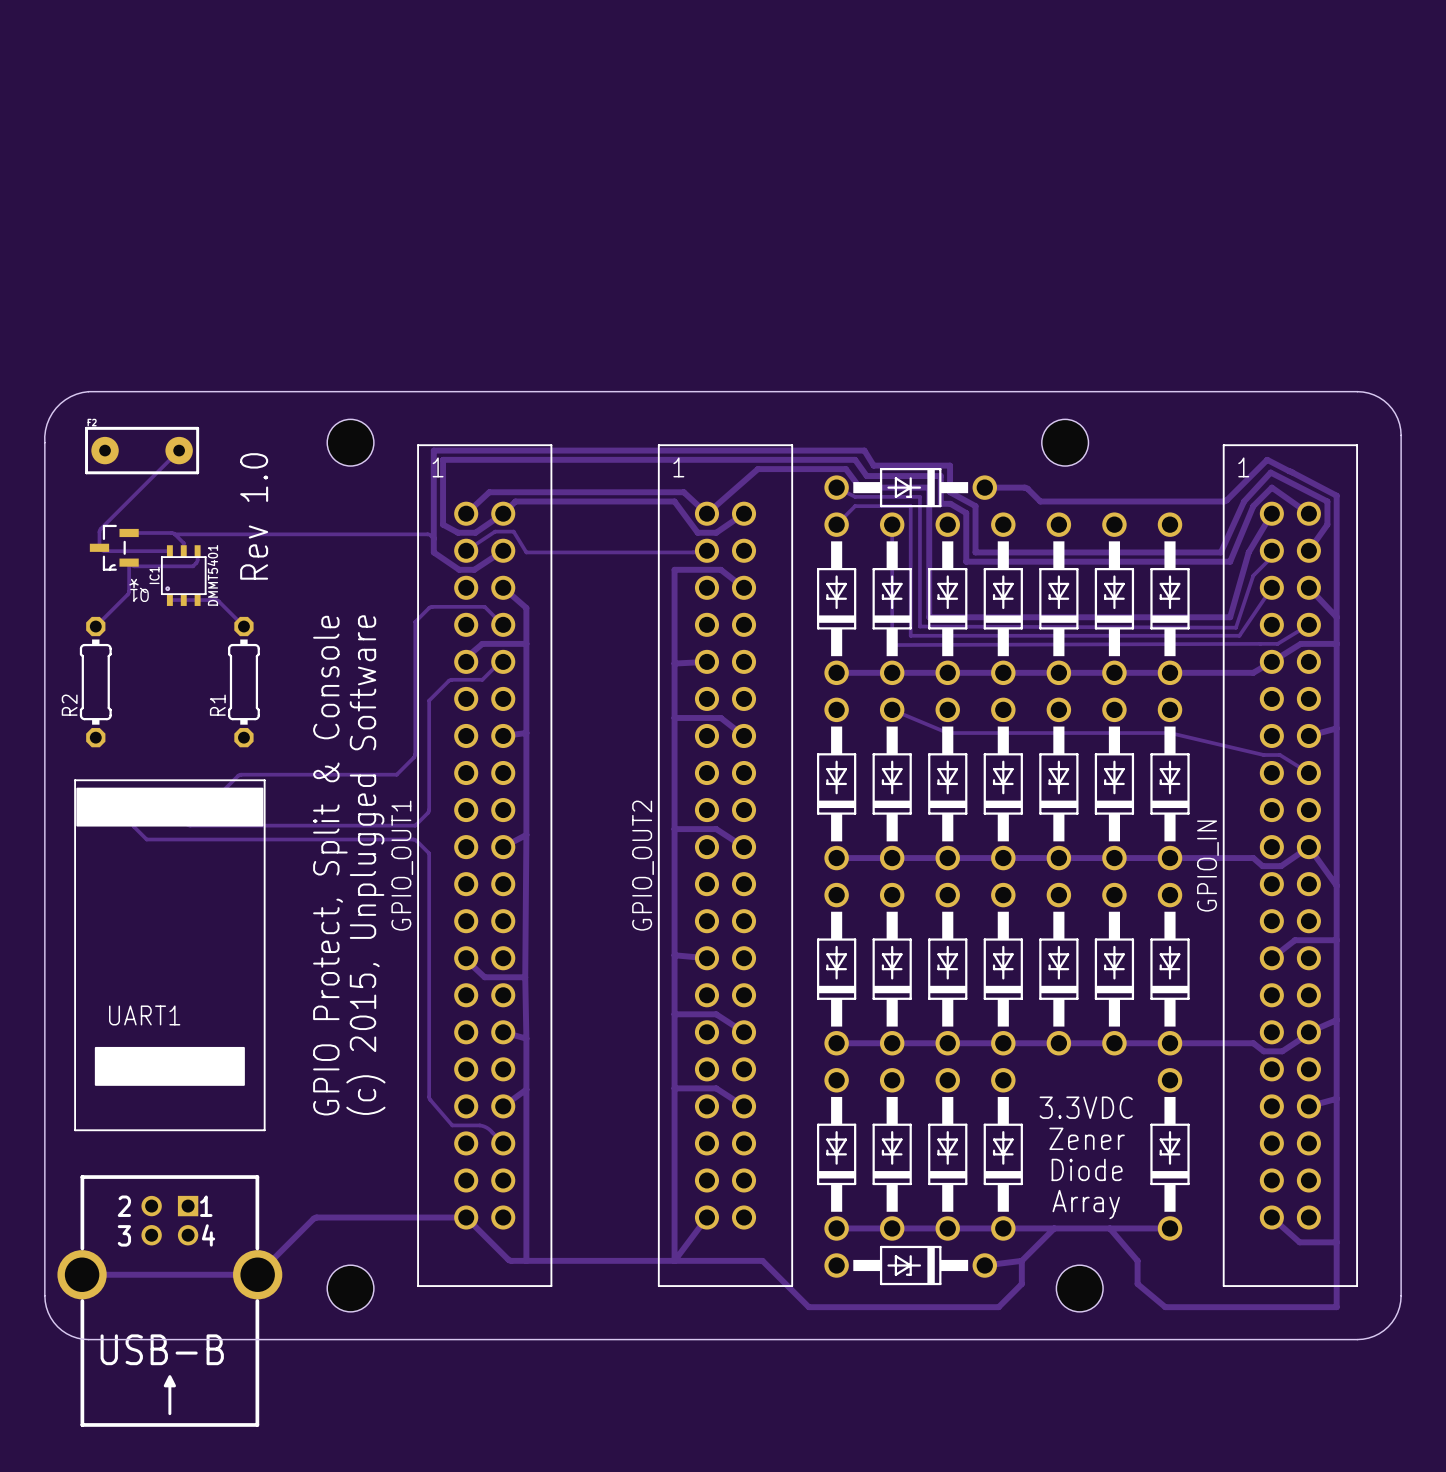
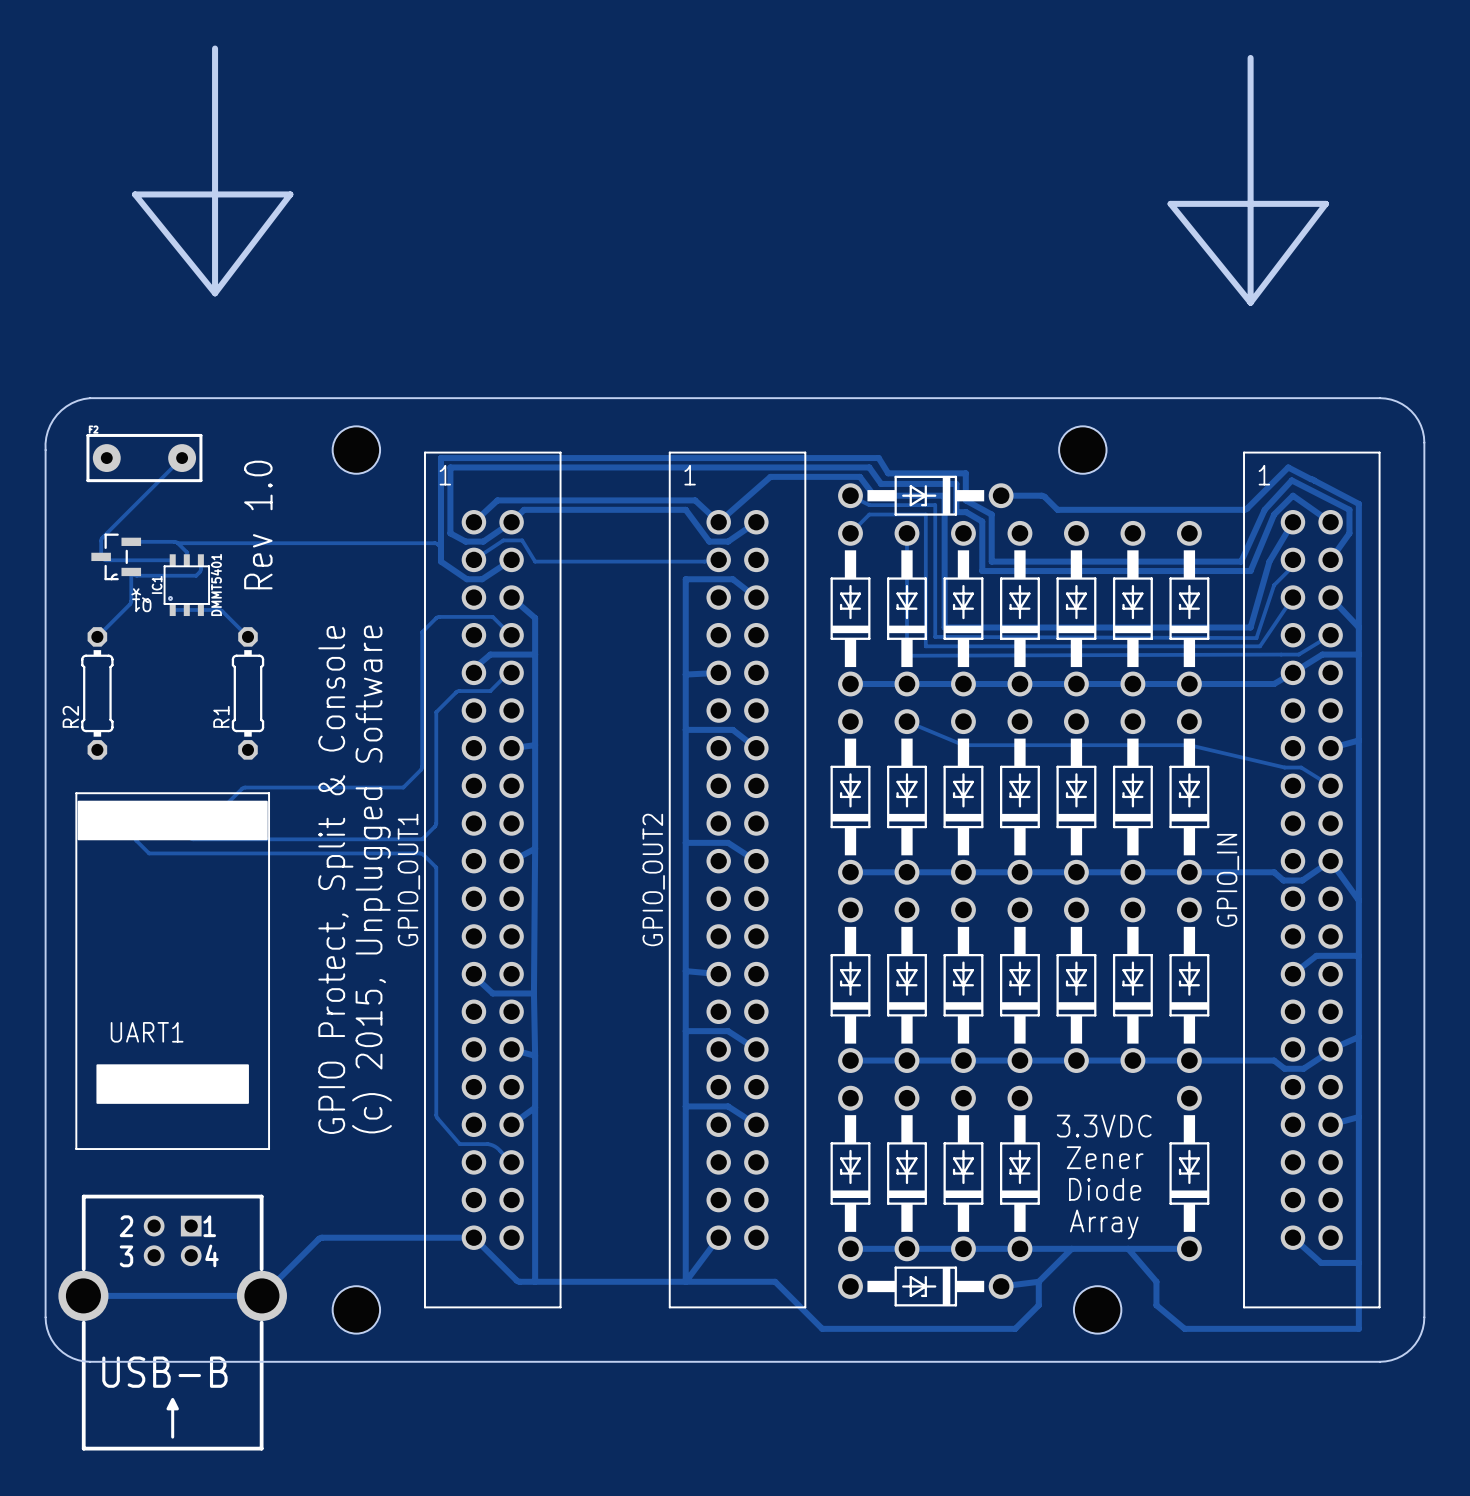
board edge: none -> (215, 48) (215, 293)
board edge: none -> (1250, 57) (1250, 302)
board edge: none -> (215, 293) (135, 194) (290, 194) (215, 293)
board edge: none -> (1250, 302) (1170, 203) (1325, 203) (1250, 302)

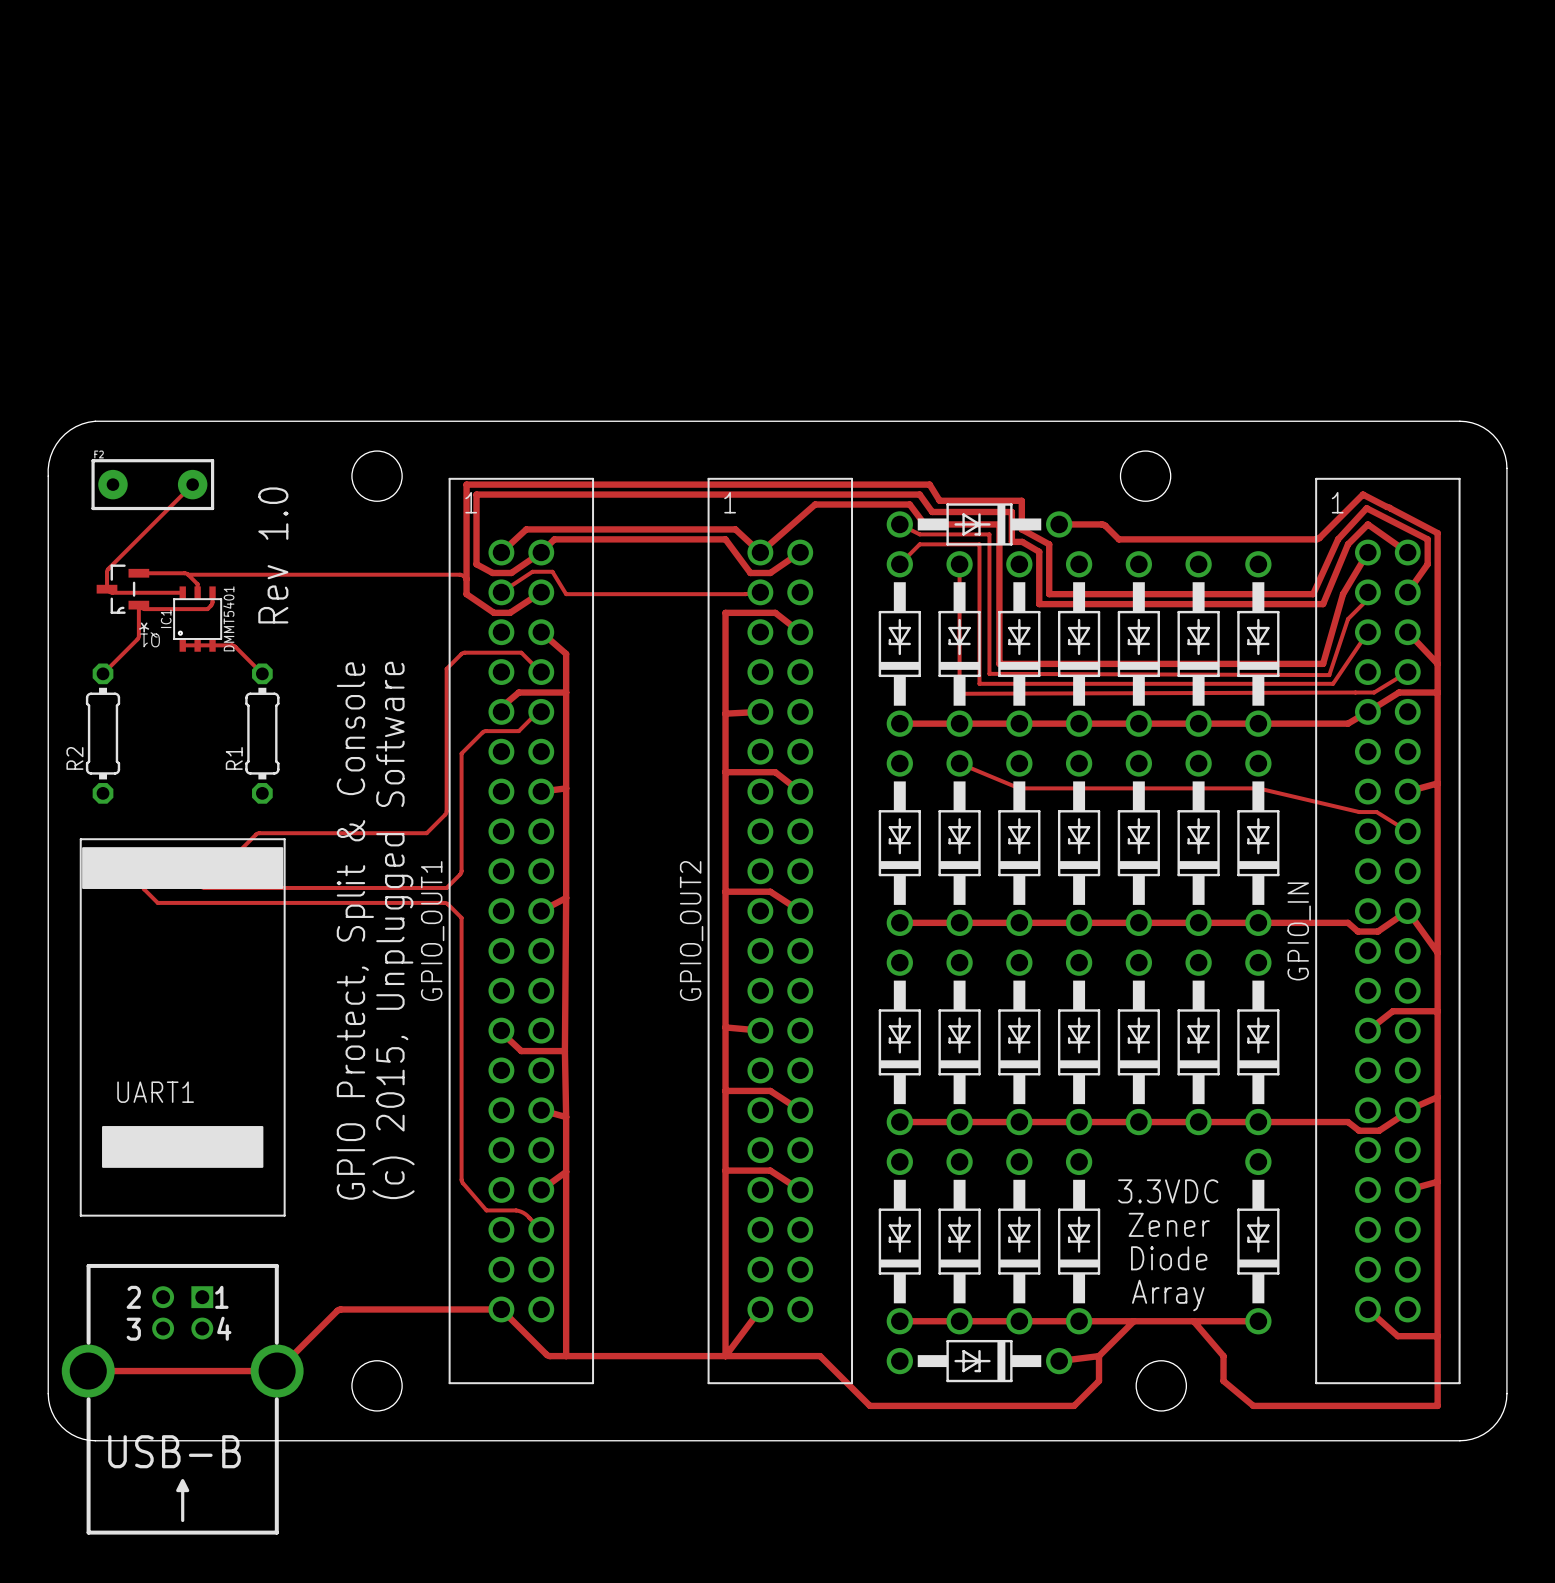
board edge: (215, 48) (215, 293) -> none
board edge: (1250, 57) (1250, 302) -> none
board edge: (215, 293) (135, 194) (290, 194) (215, 293) -> none
board edge: (1250, 302) (1170, 203) (1325, 203) (1250, 302) -> none

